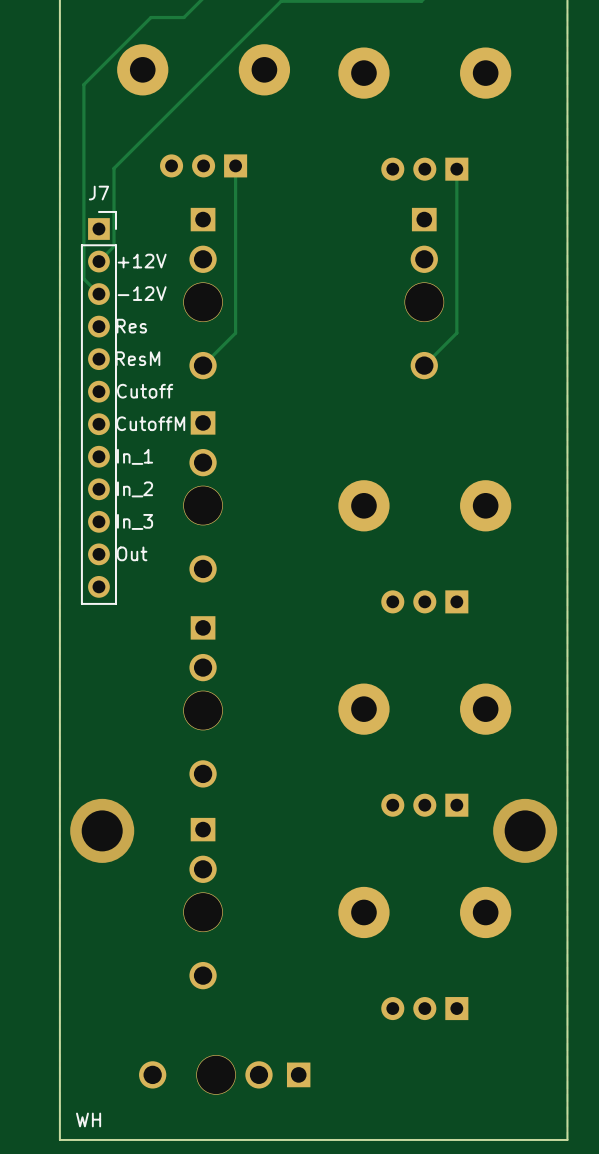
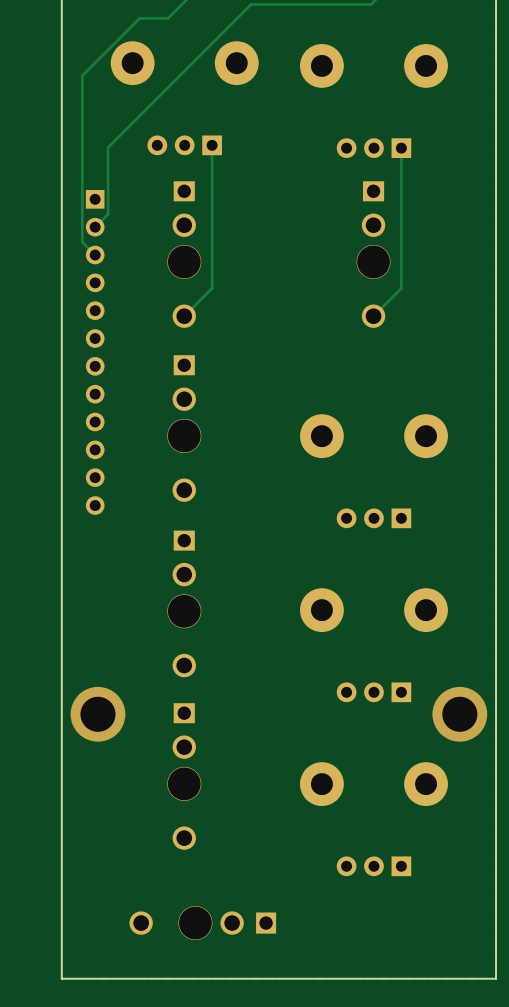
text: +12V (142, 261) -> none
text: -12V (142, 293) -> none
text: Res (131, 326) -> none
text: ResM (137, 358) -> none
text: Cutoff (145, 391) -> none
J7 side: bottom (98, 407) -> top (95, 352)
text: CutoffM (150, 423) -> none
text: In_1 (135, 456) -> none
text: In_2 (135, 489) -> none
text: In_3 (135, 521) -> none
text: Out (132, 553) -> none
text: WH (88, 1119) -> none

